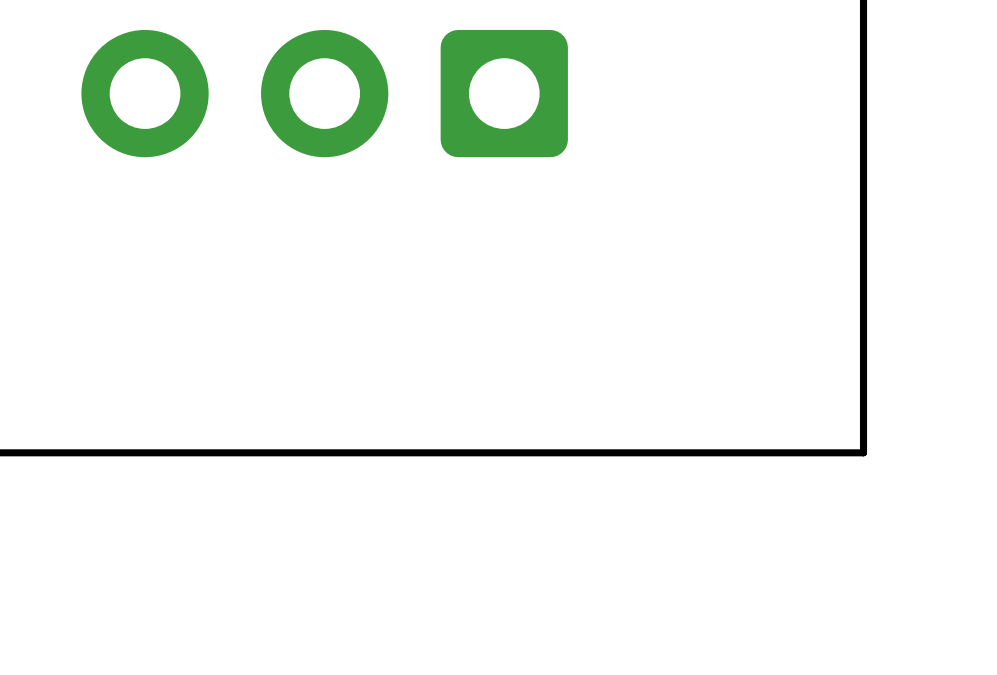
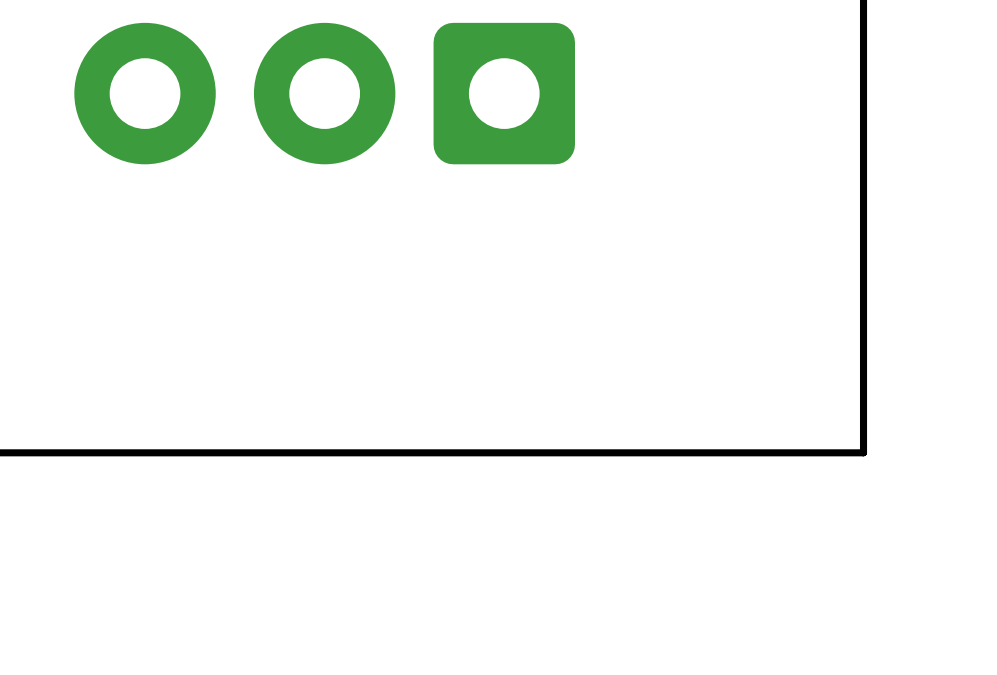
part footprint: [81, 29, 568, 158] -> [74, 22, 575, 165]

